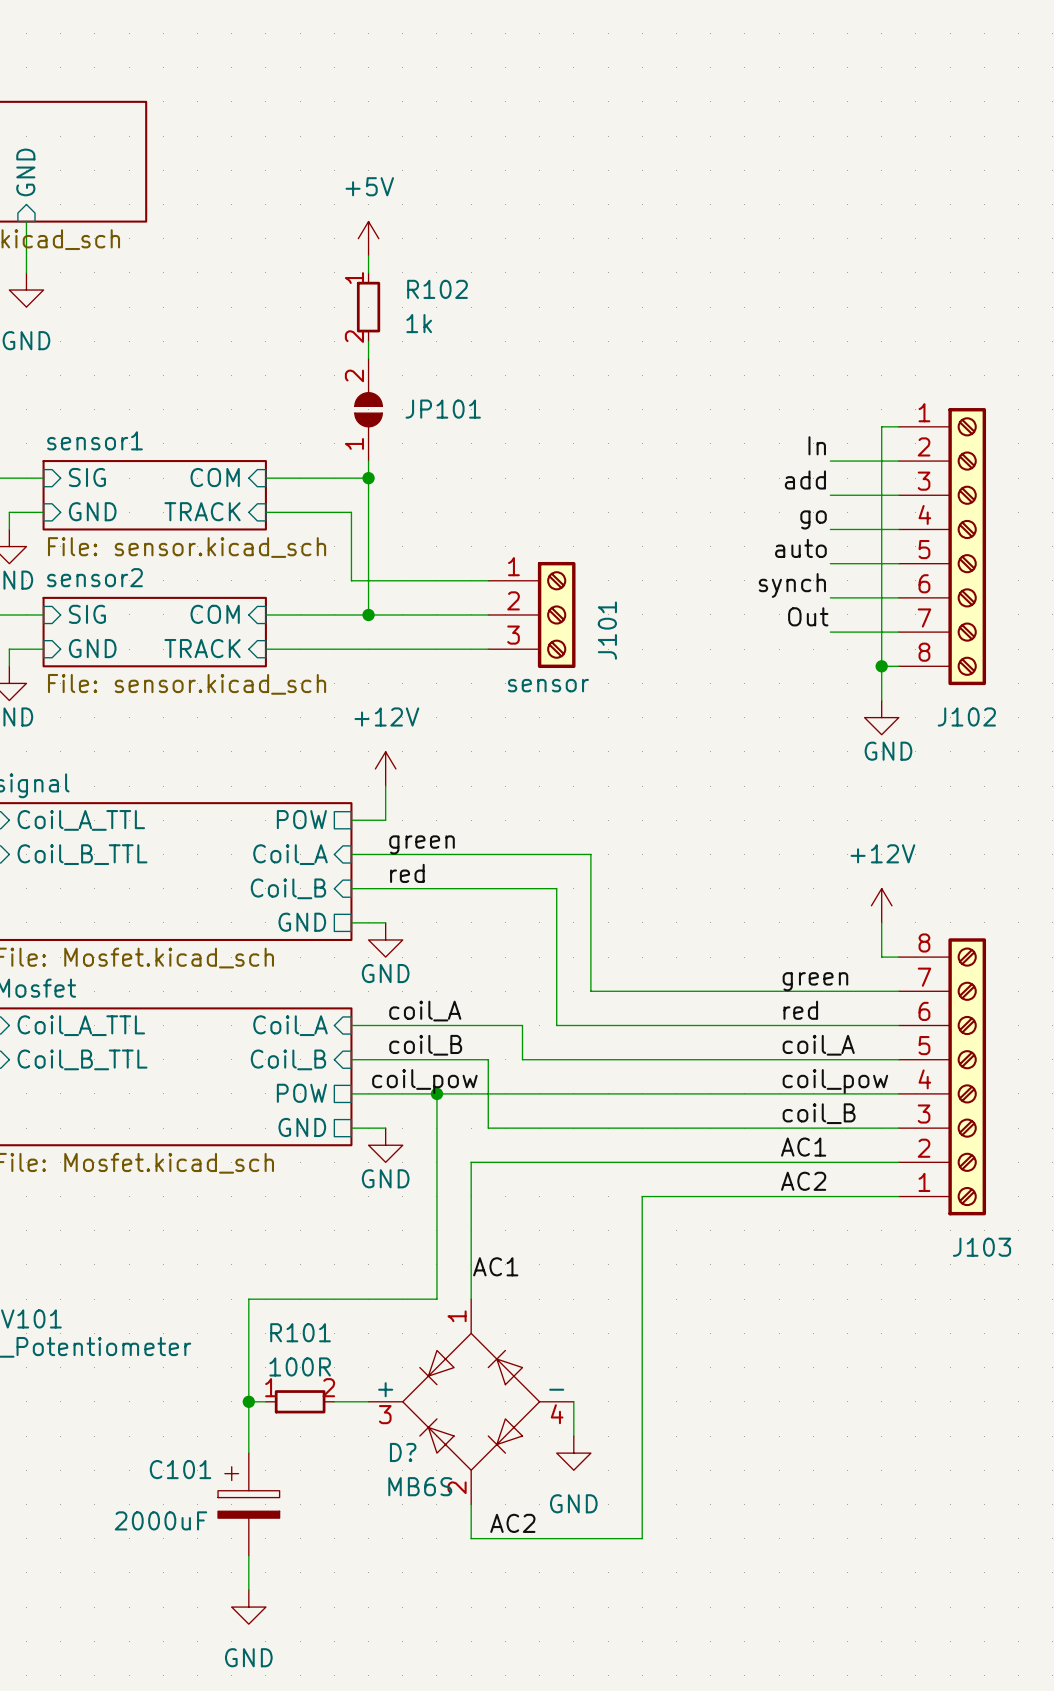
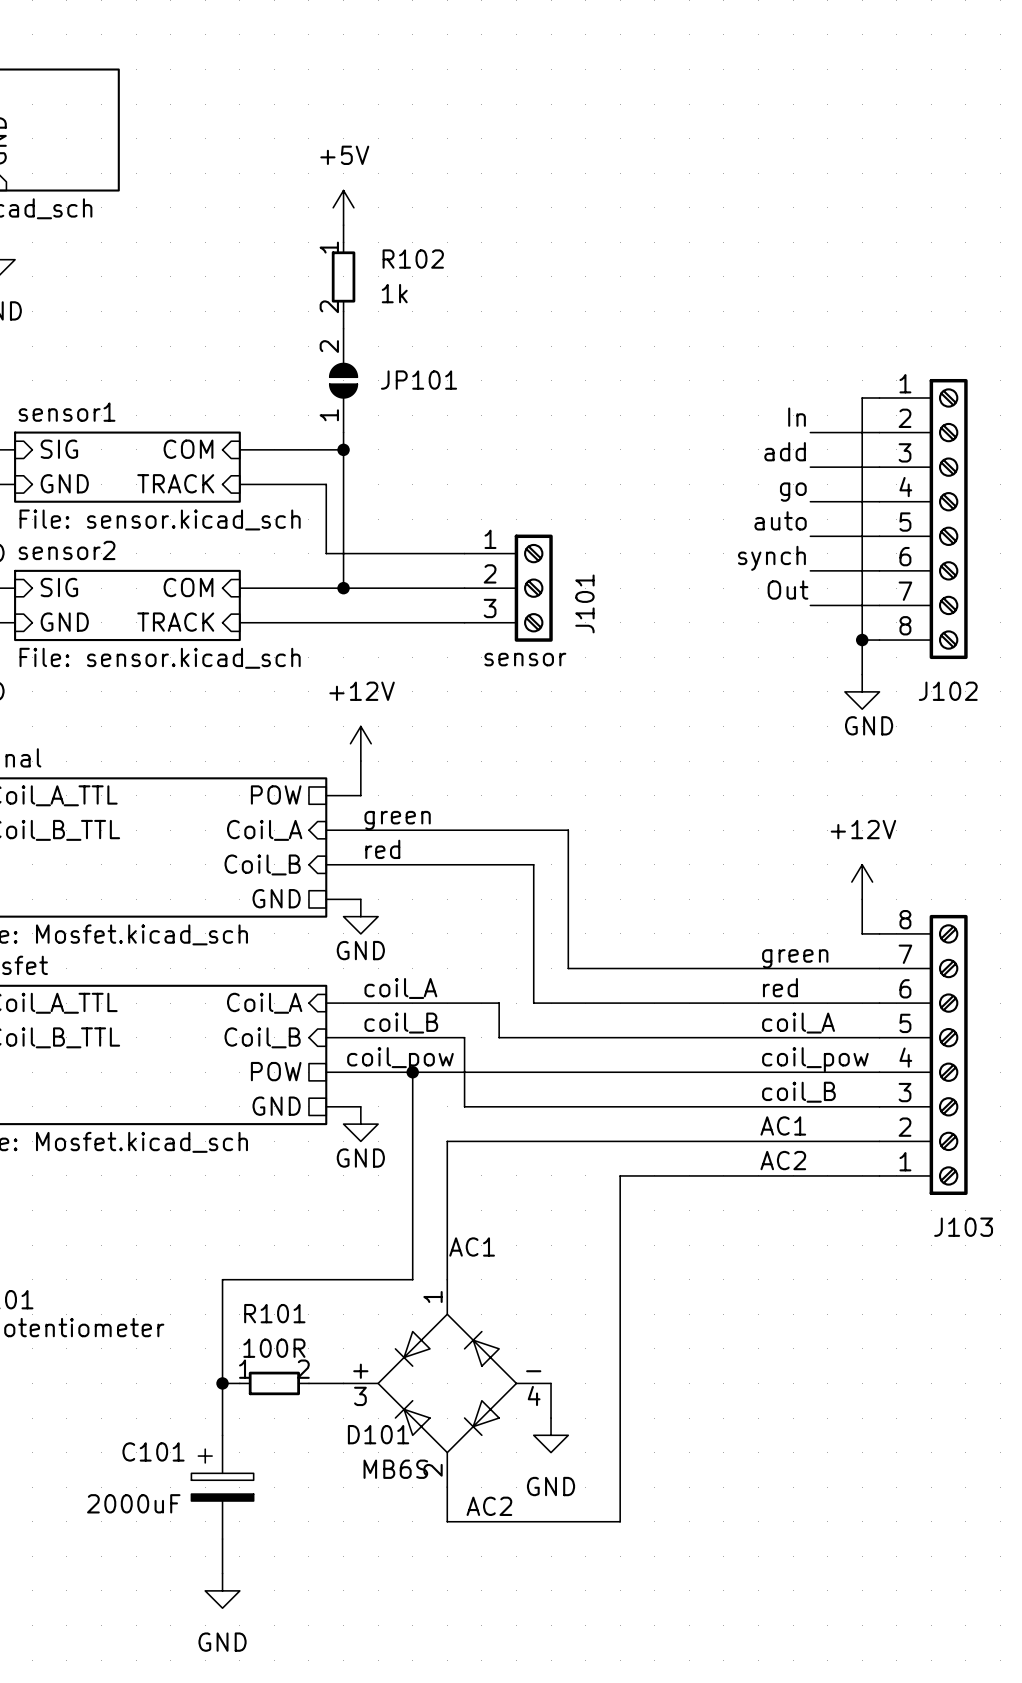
D? name: D? (403, 1452) -> D101 (378, 1434)

